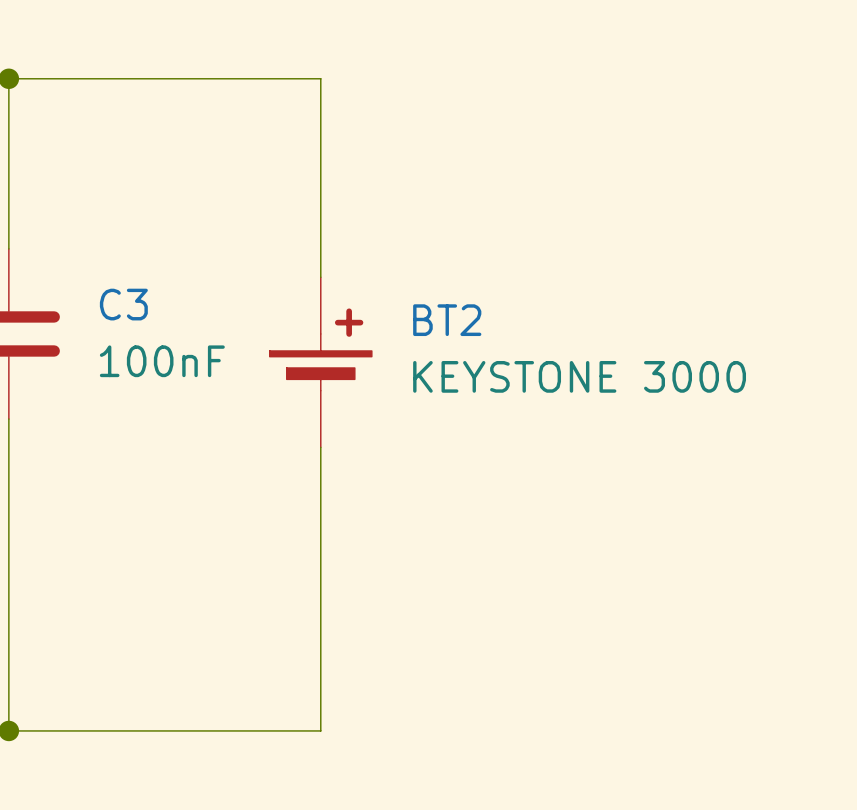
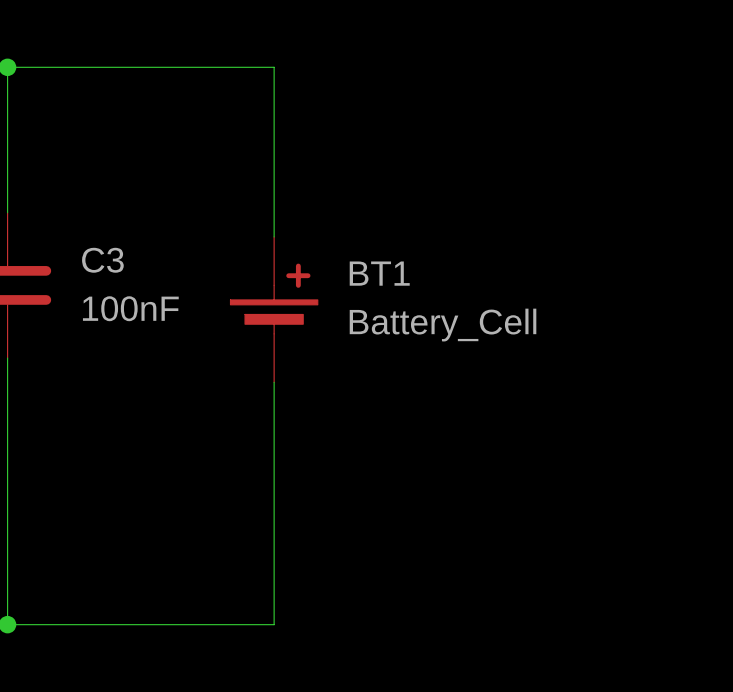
BT2 name: BT2 (447, 320) -> BT1 (379, 273)
BT2 value: KEYSTONE 3000 (579, 376) -> Battery_Cell (443, 325)

